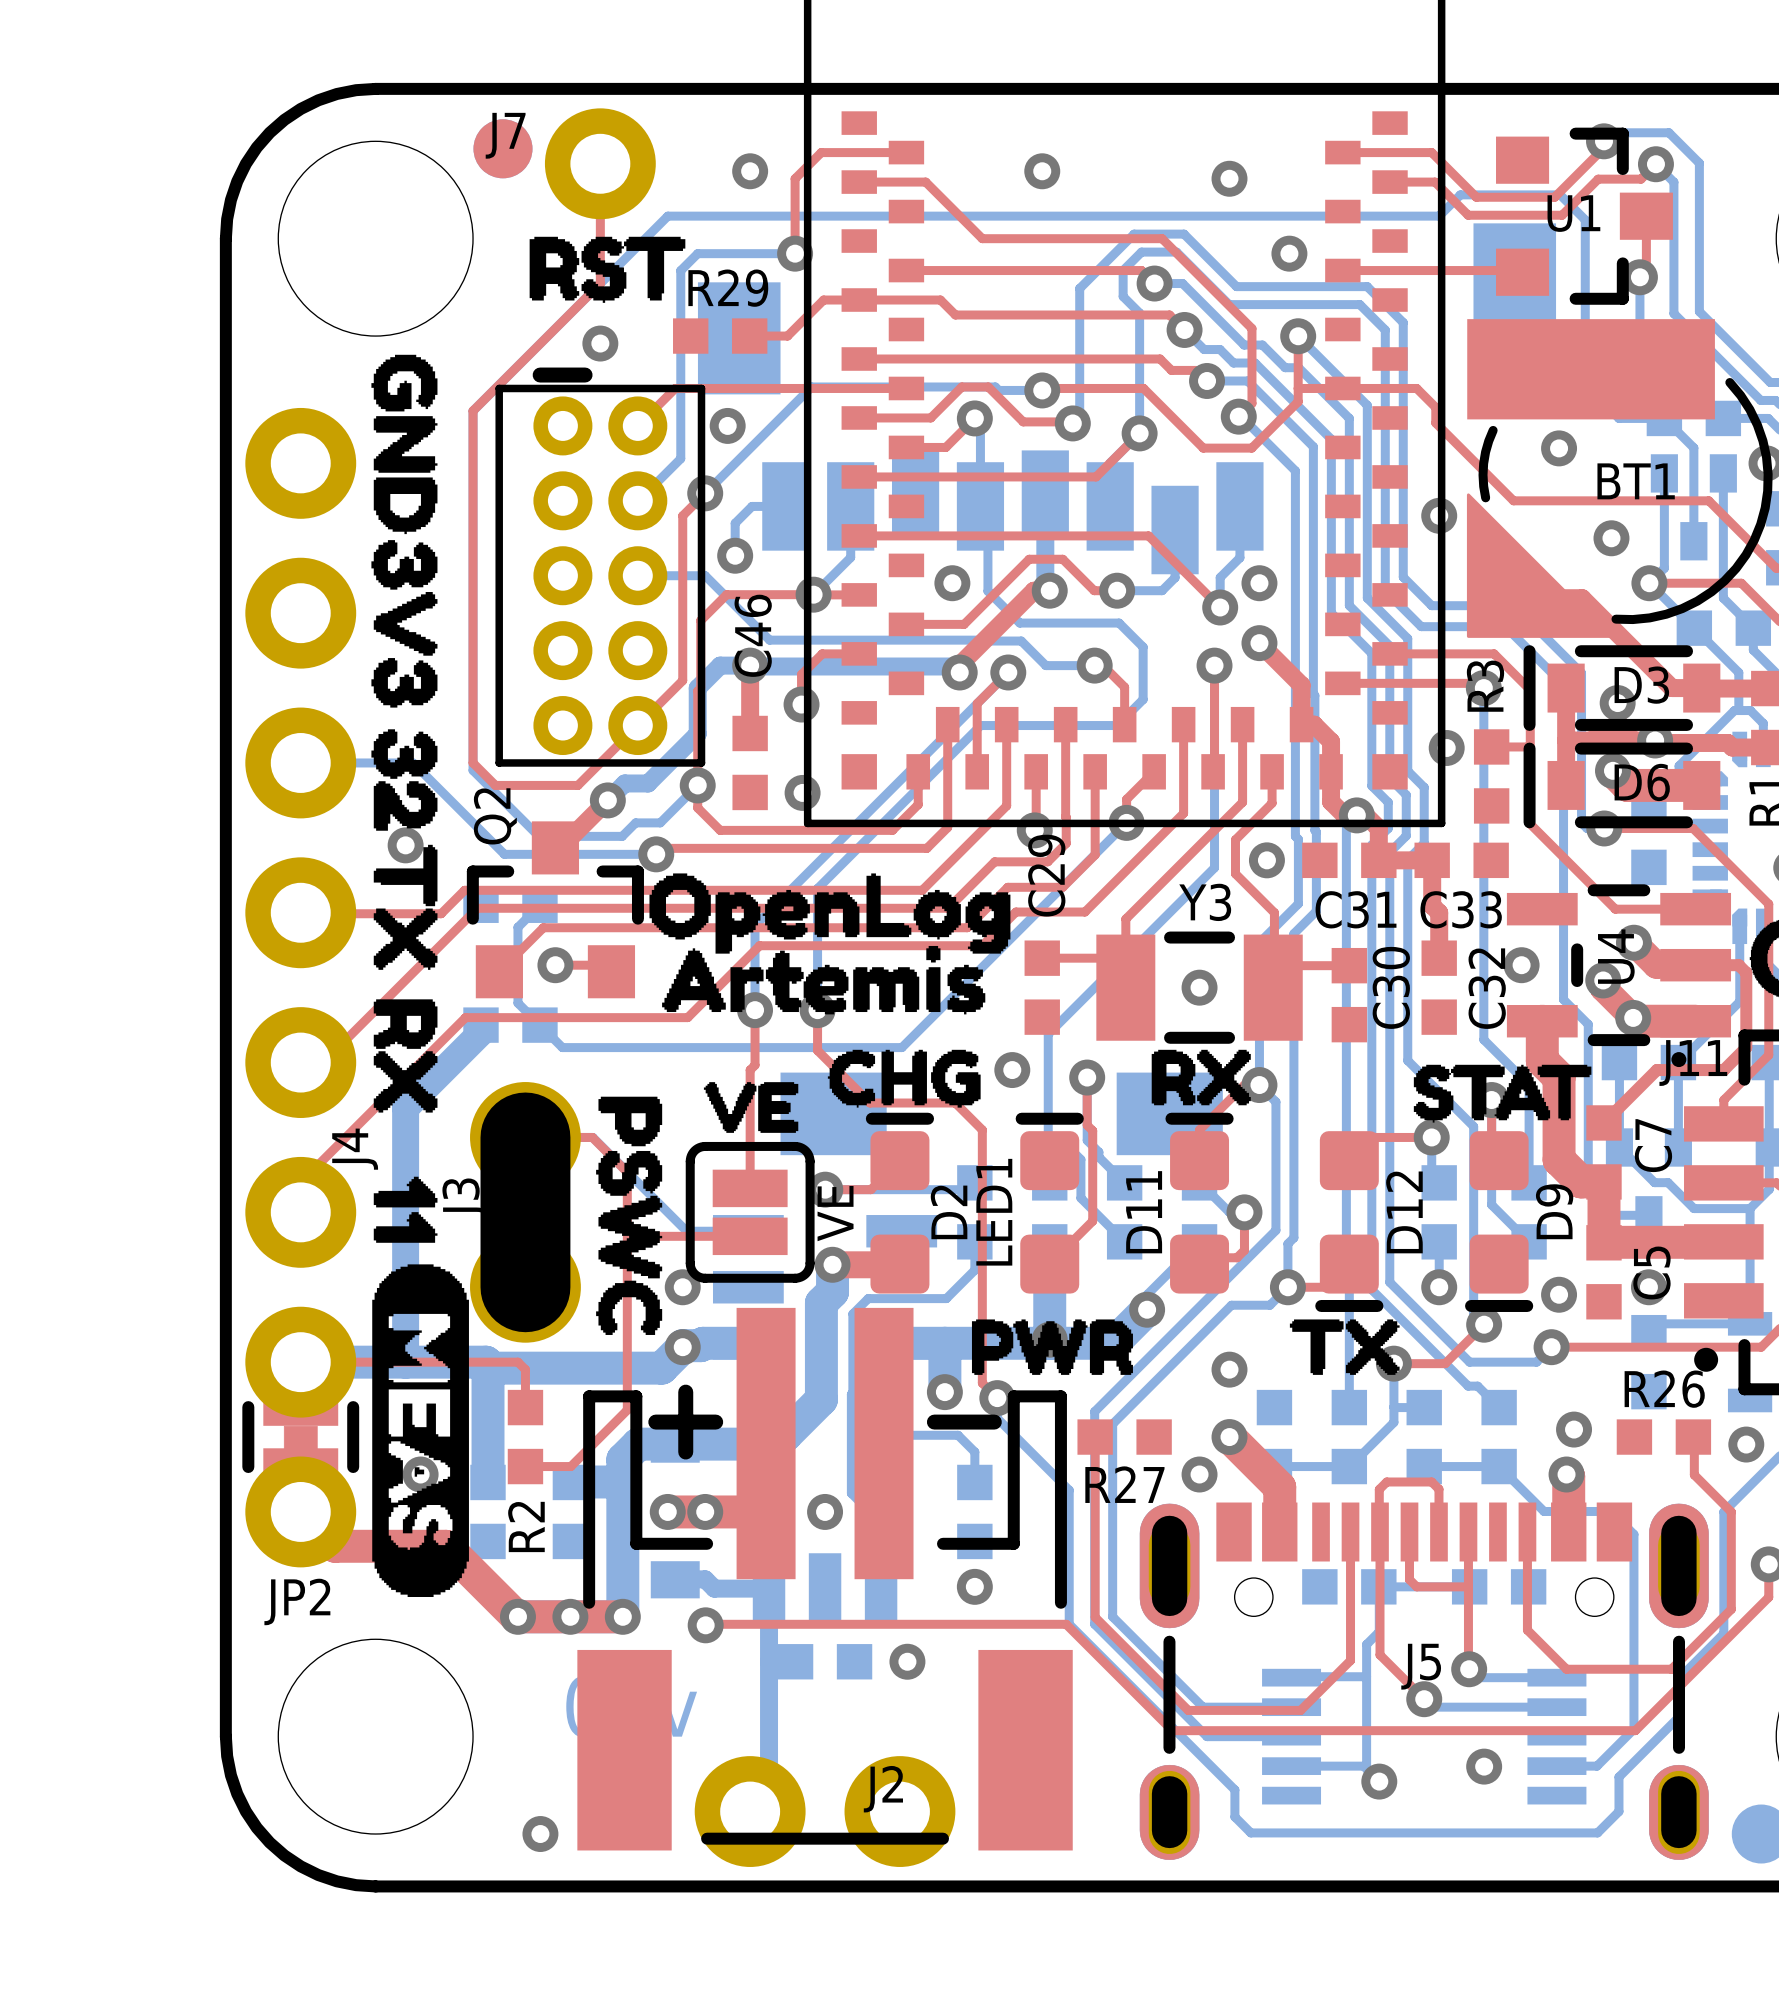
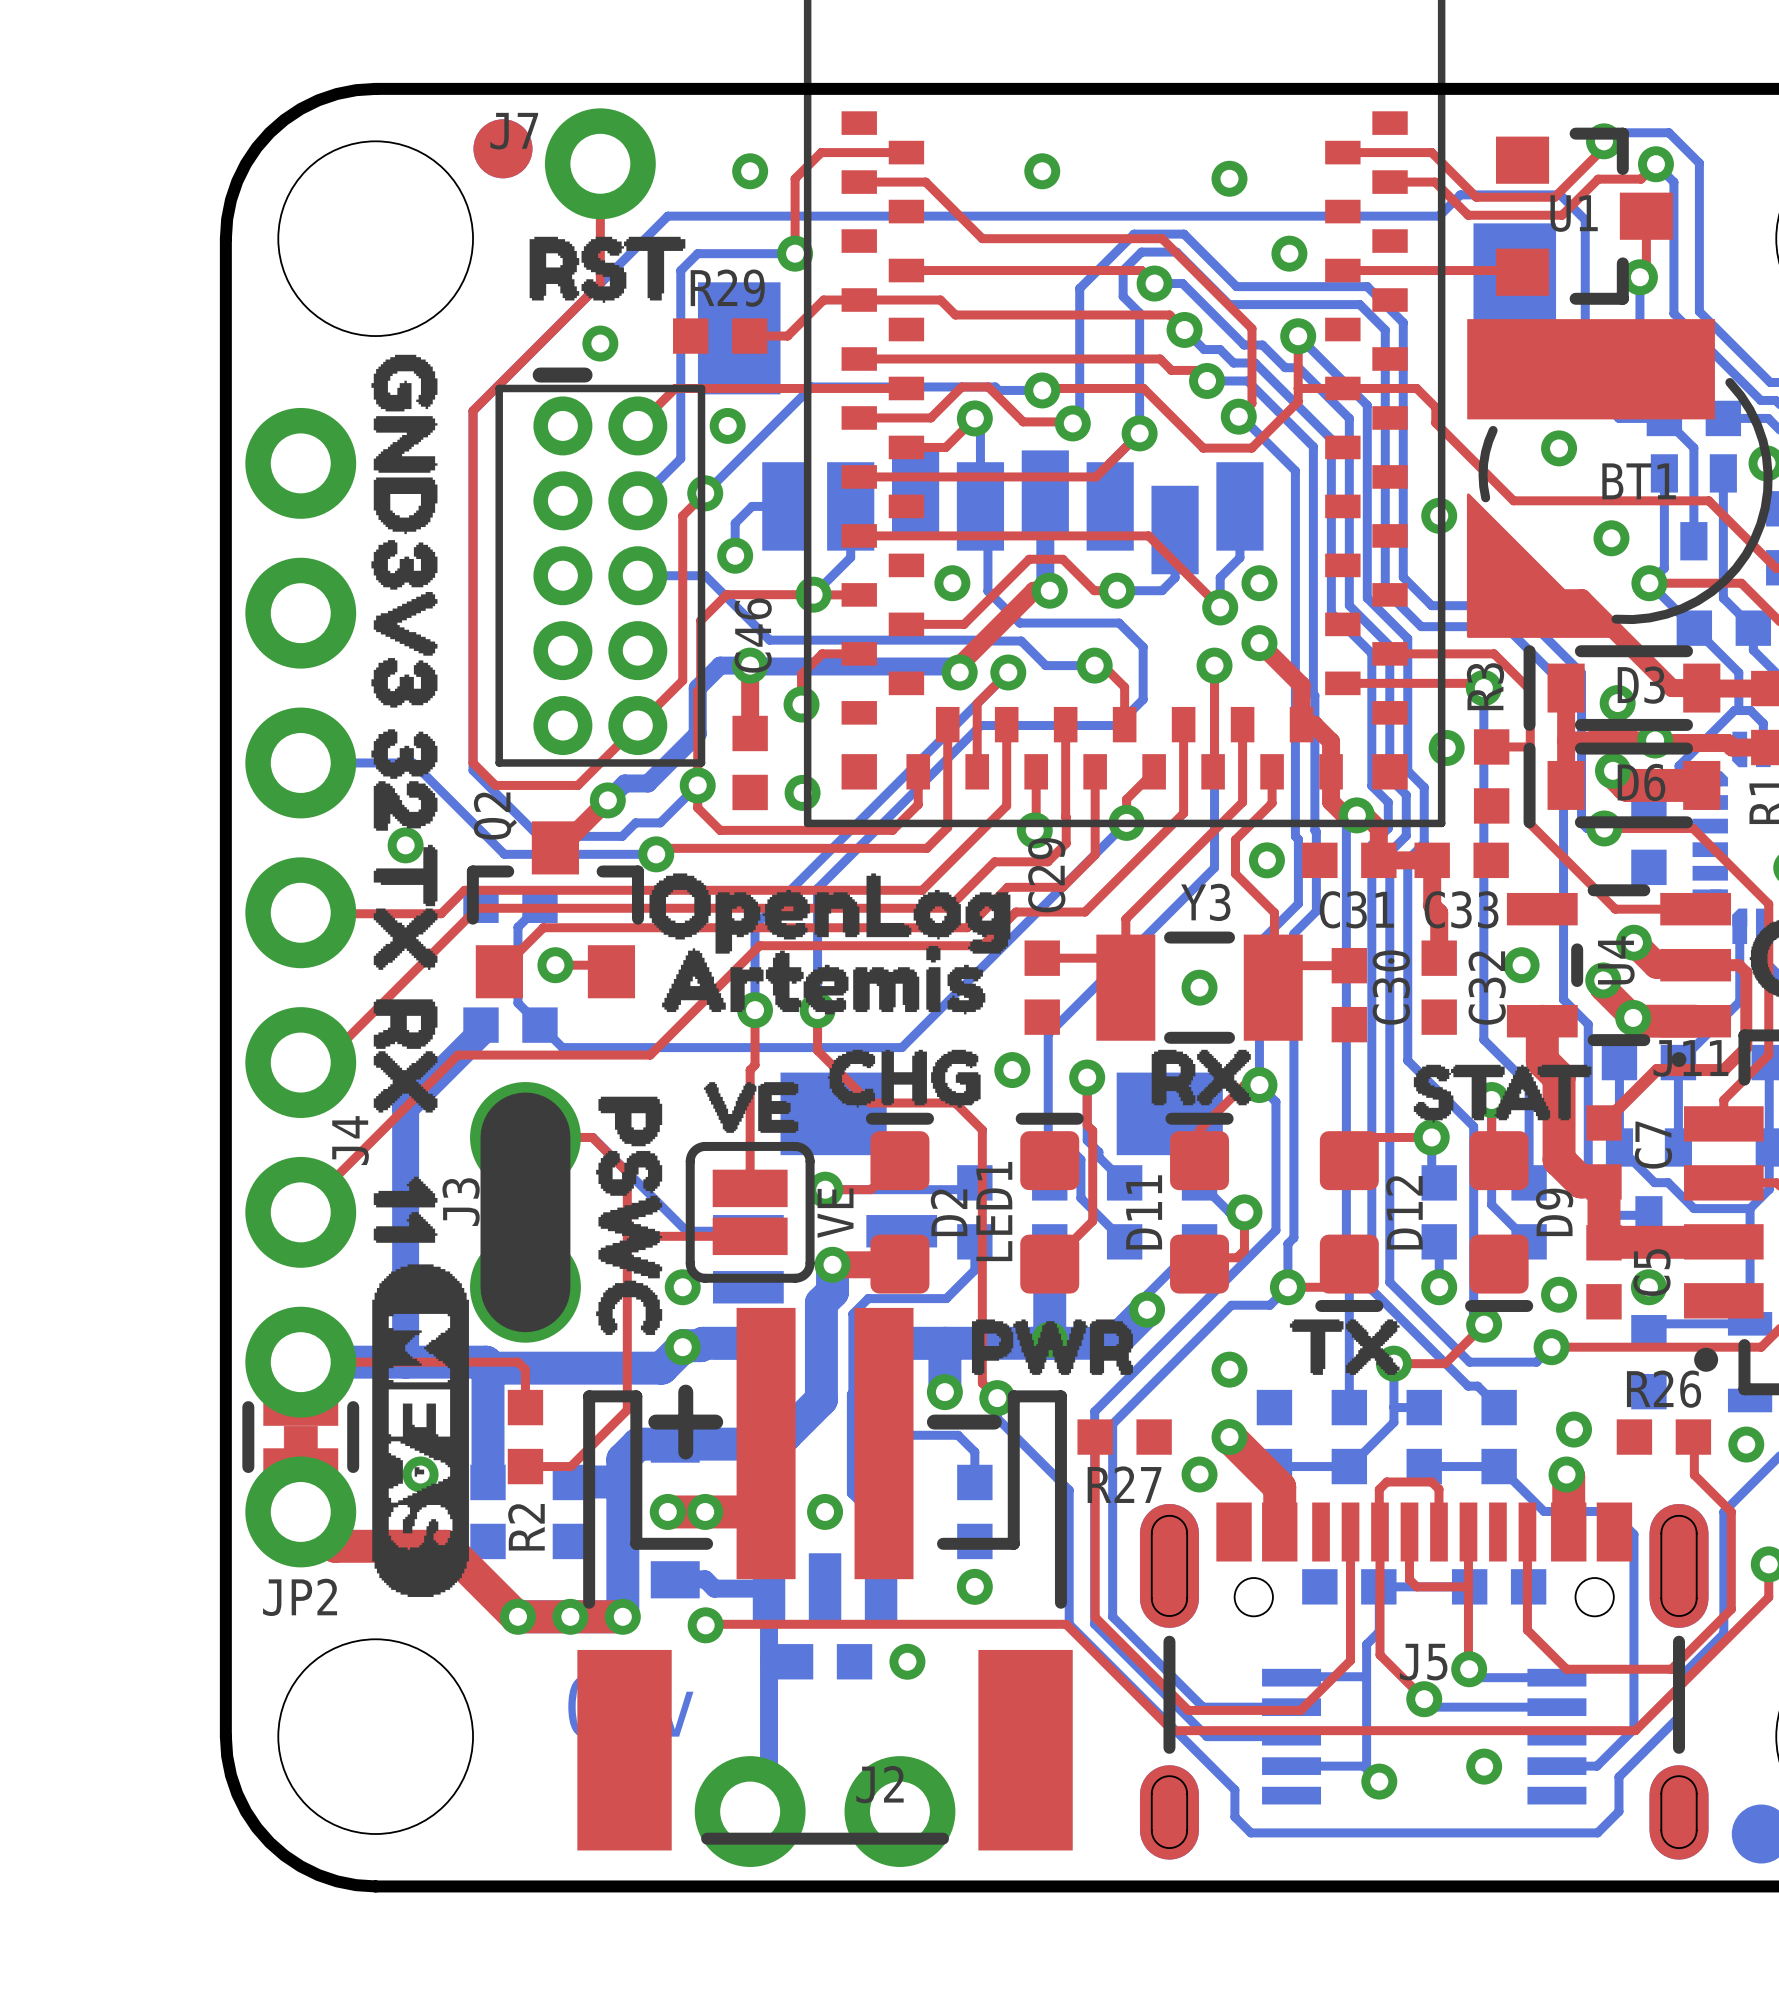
top track: (687, 1017) (465, 1017) (300, 1182) (300, 1212) -> (687, 1017) (650, 1055) (458, 1055) (300, 1212)
J5 footprint: [1139, 1502, 1709, 1860] -> [1139, 1502, 1709, 1860]
via: (540, 1834) -> none

